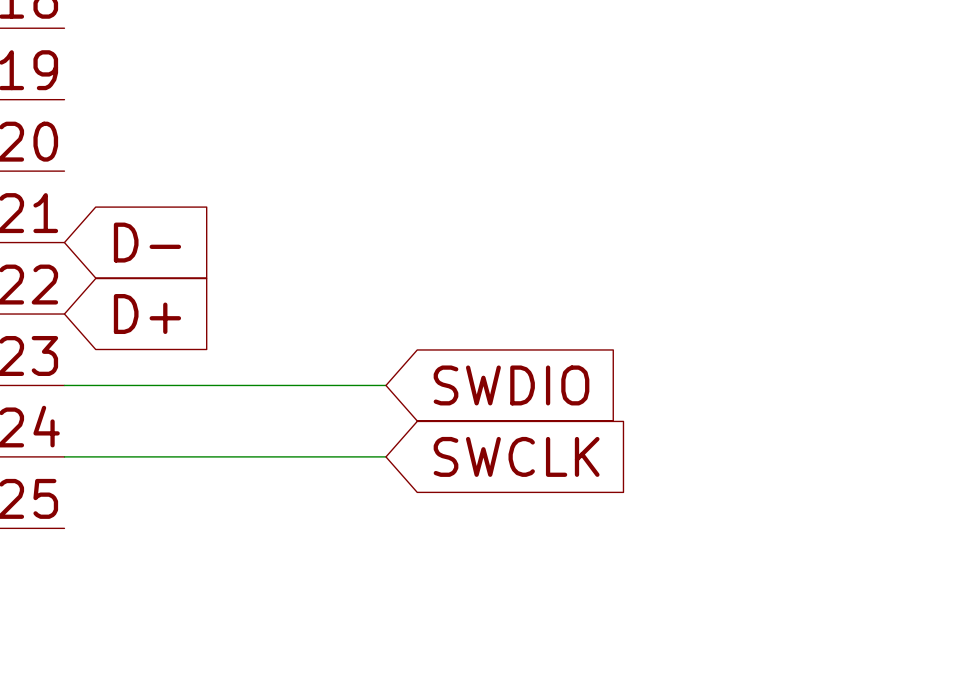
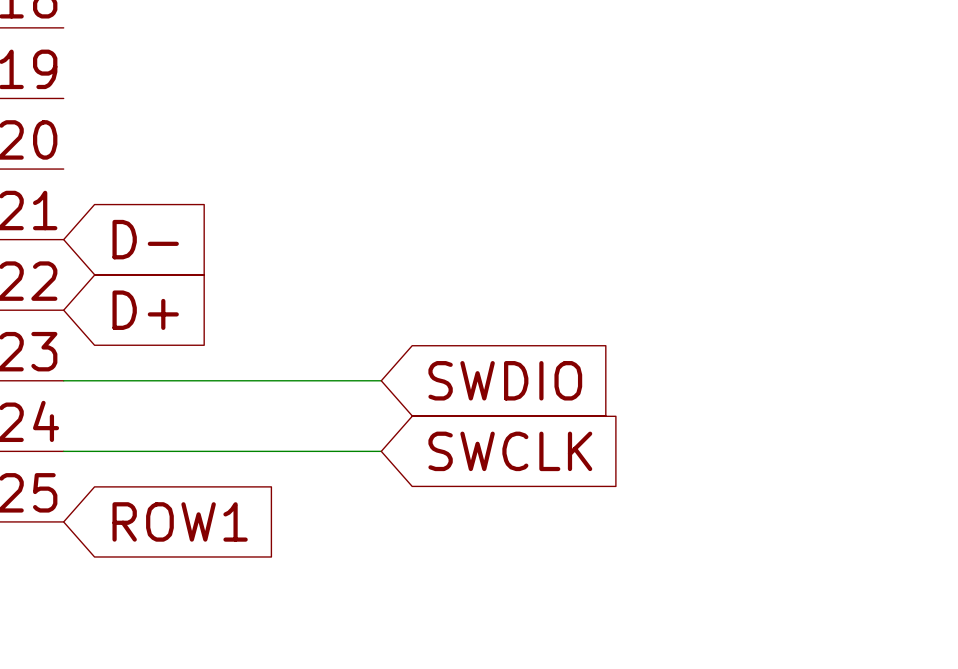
global label: none -> ROW1 (180, 521)

